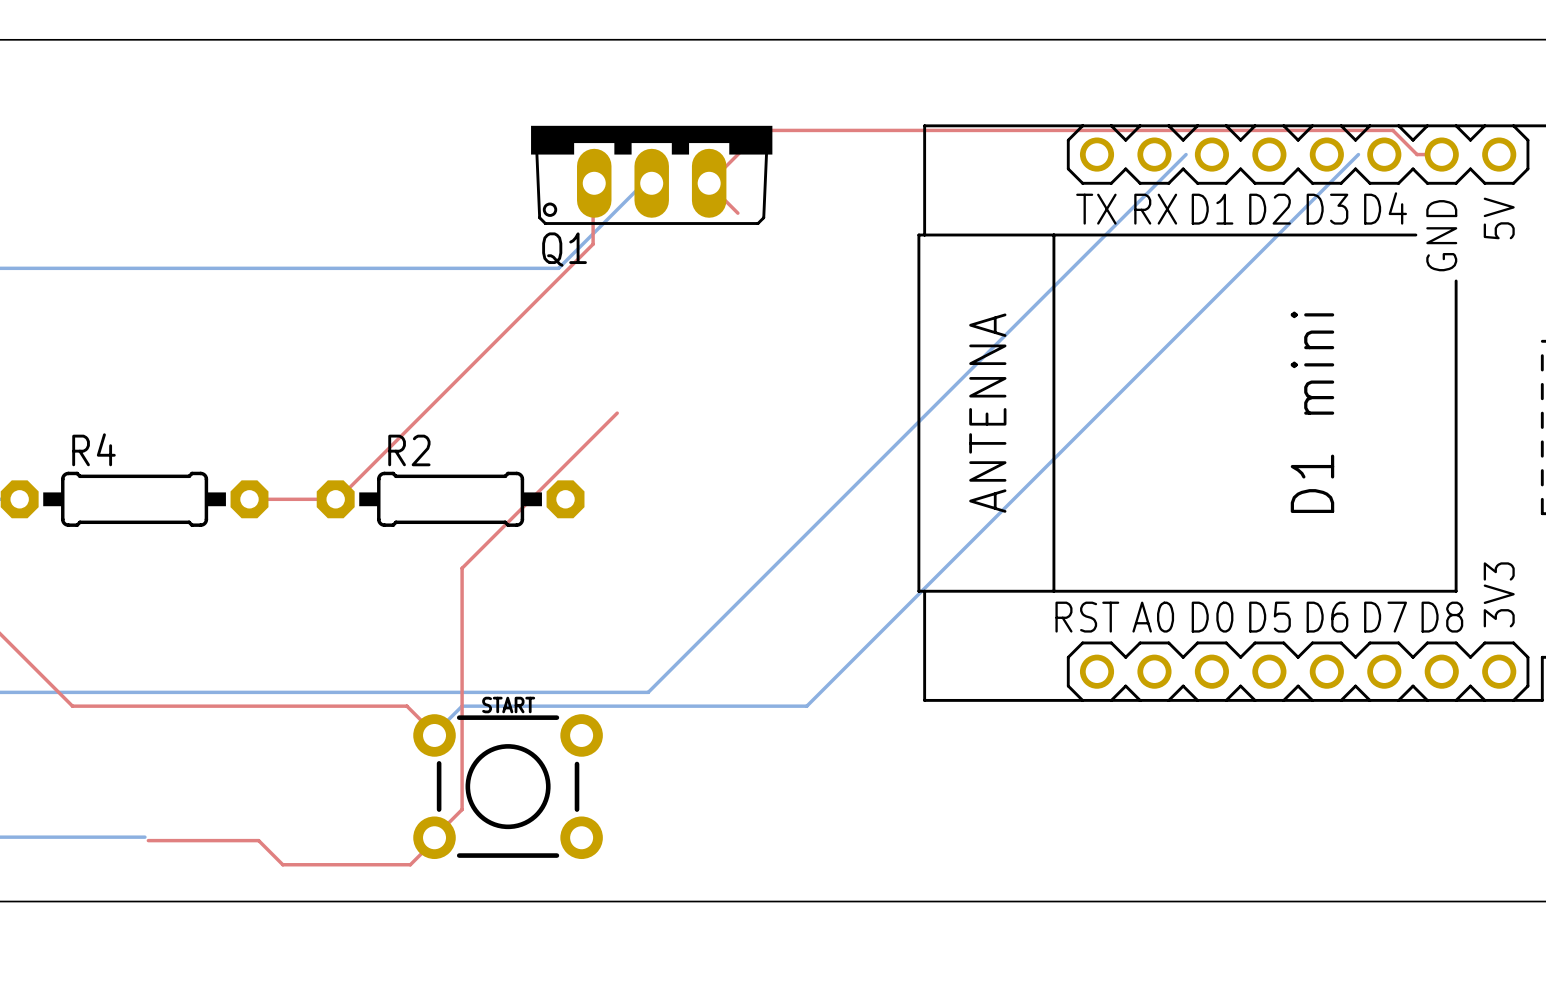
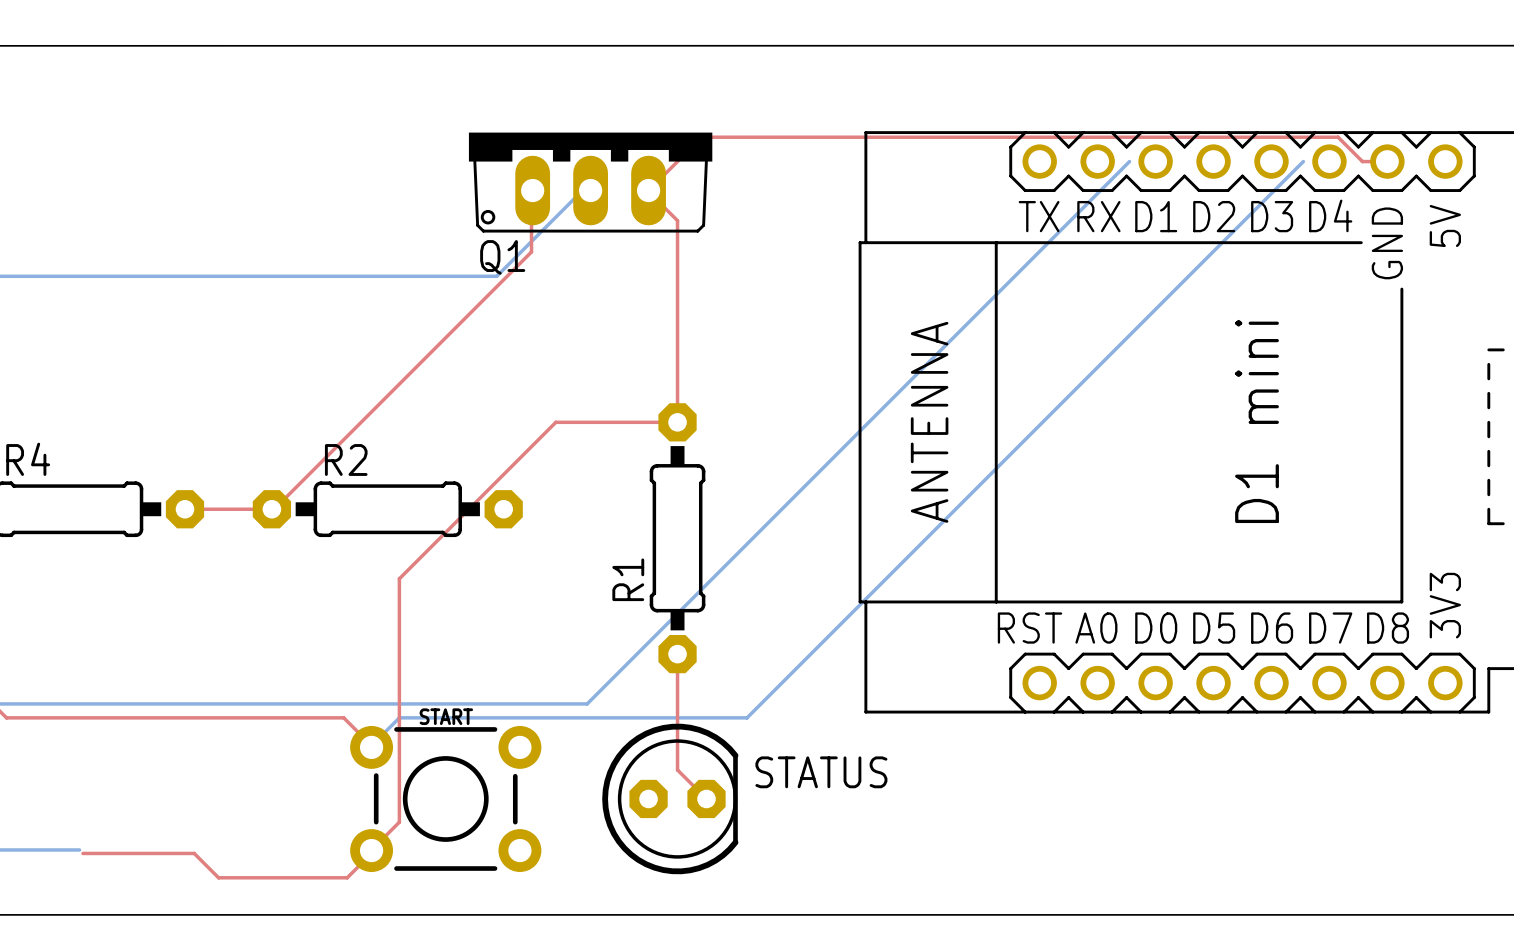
top track: none -> (677, 220) (677, 422) (555, 422)
R1: none -> (677, 538)
top track: none -> (677, 654) (677, 770) (706, 798)
STATUS: none -> (670, 798)

